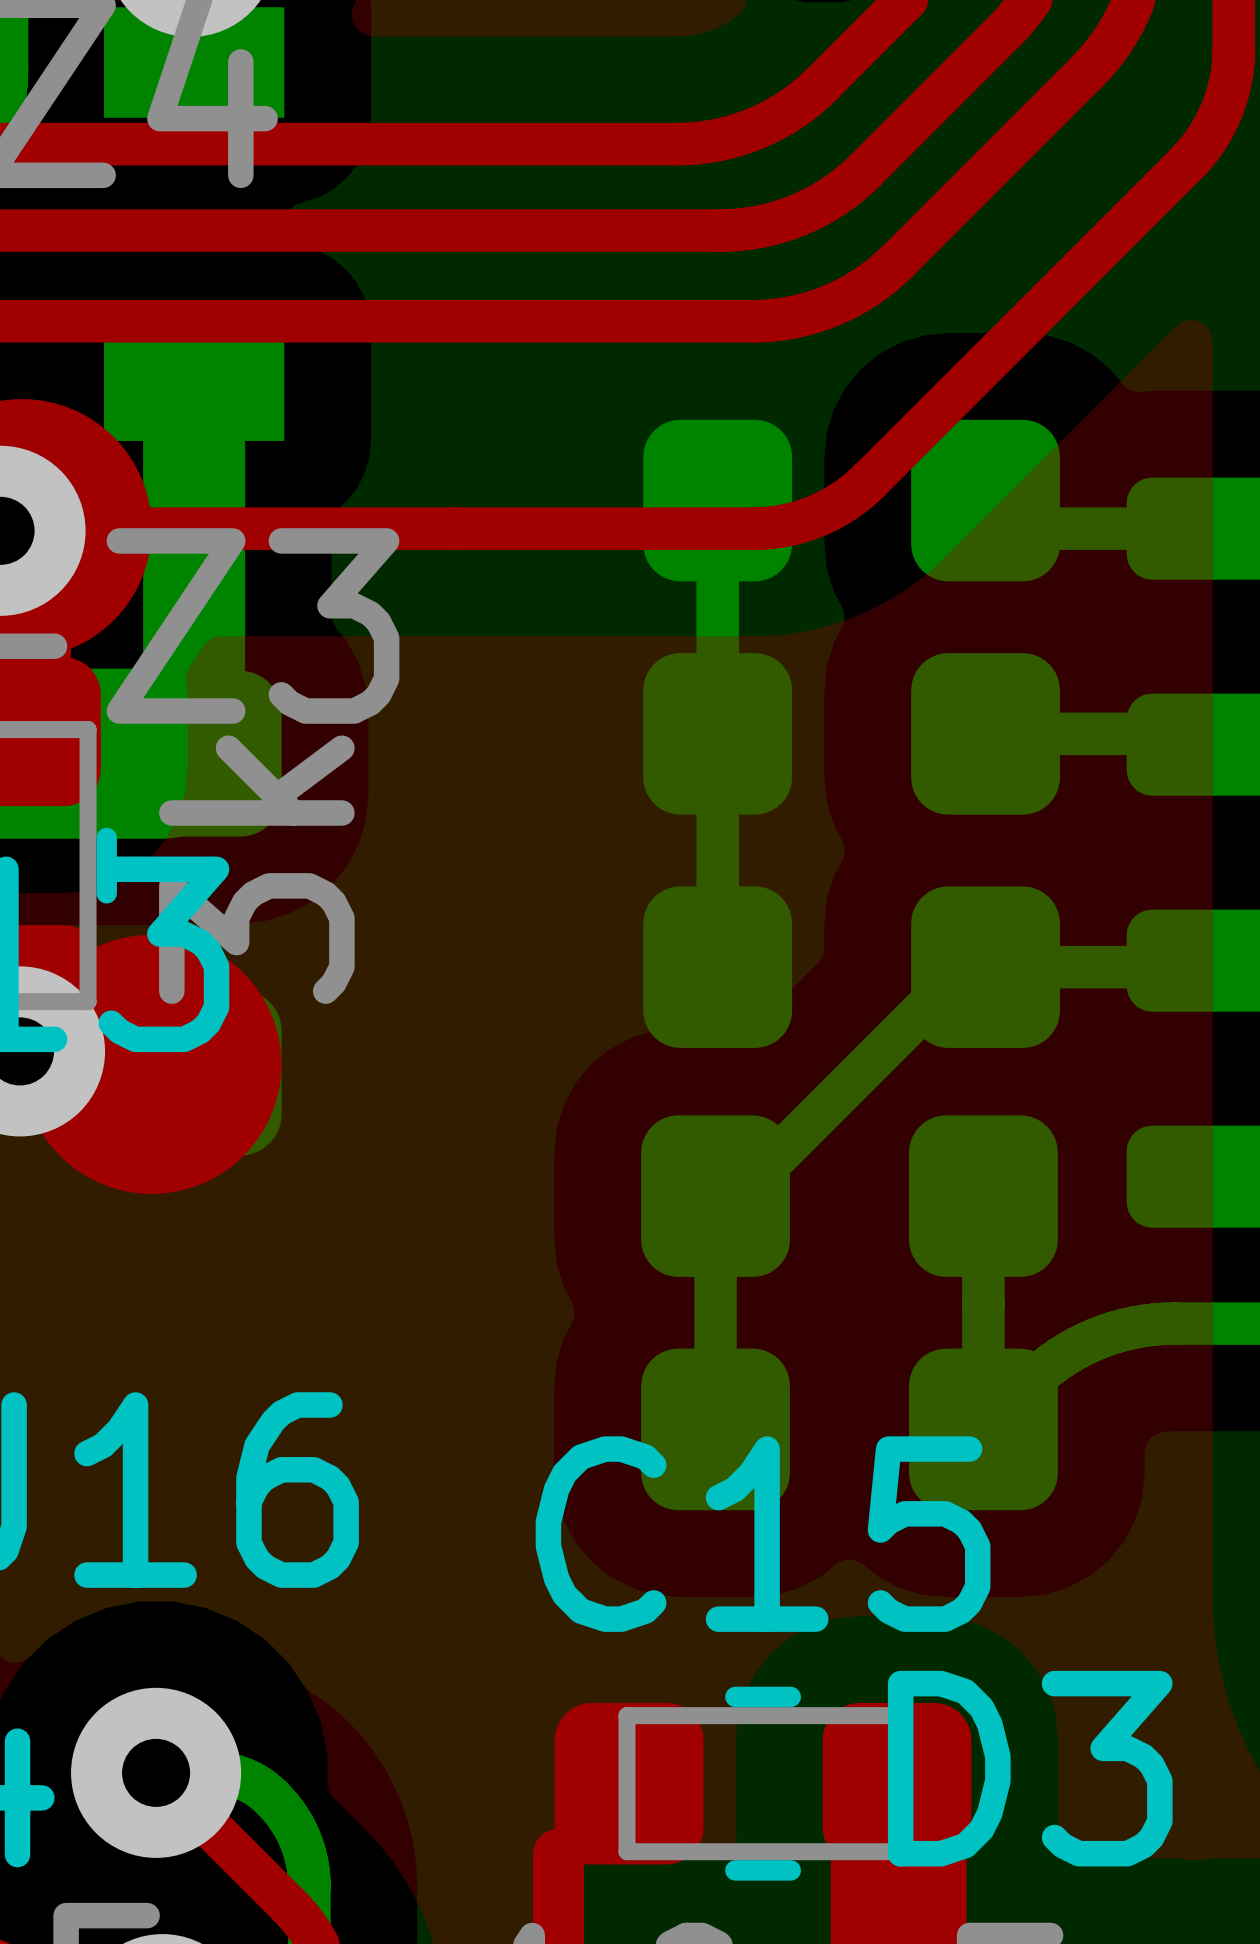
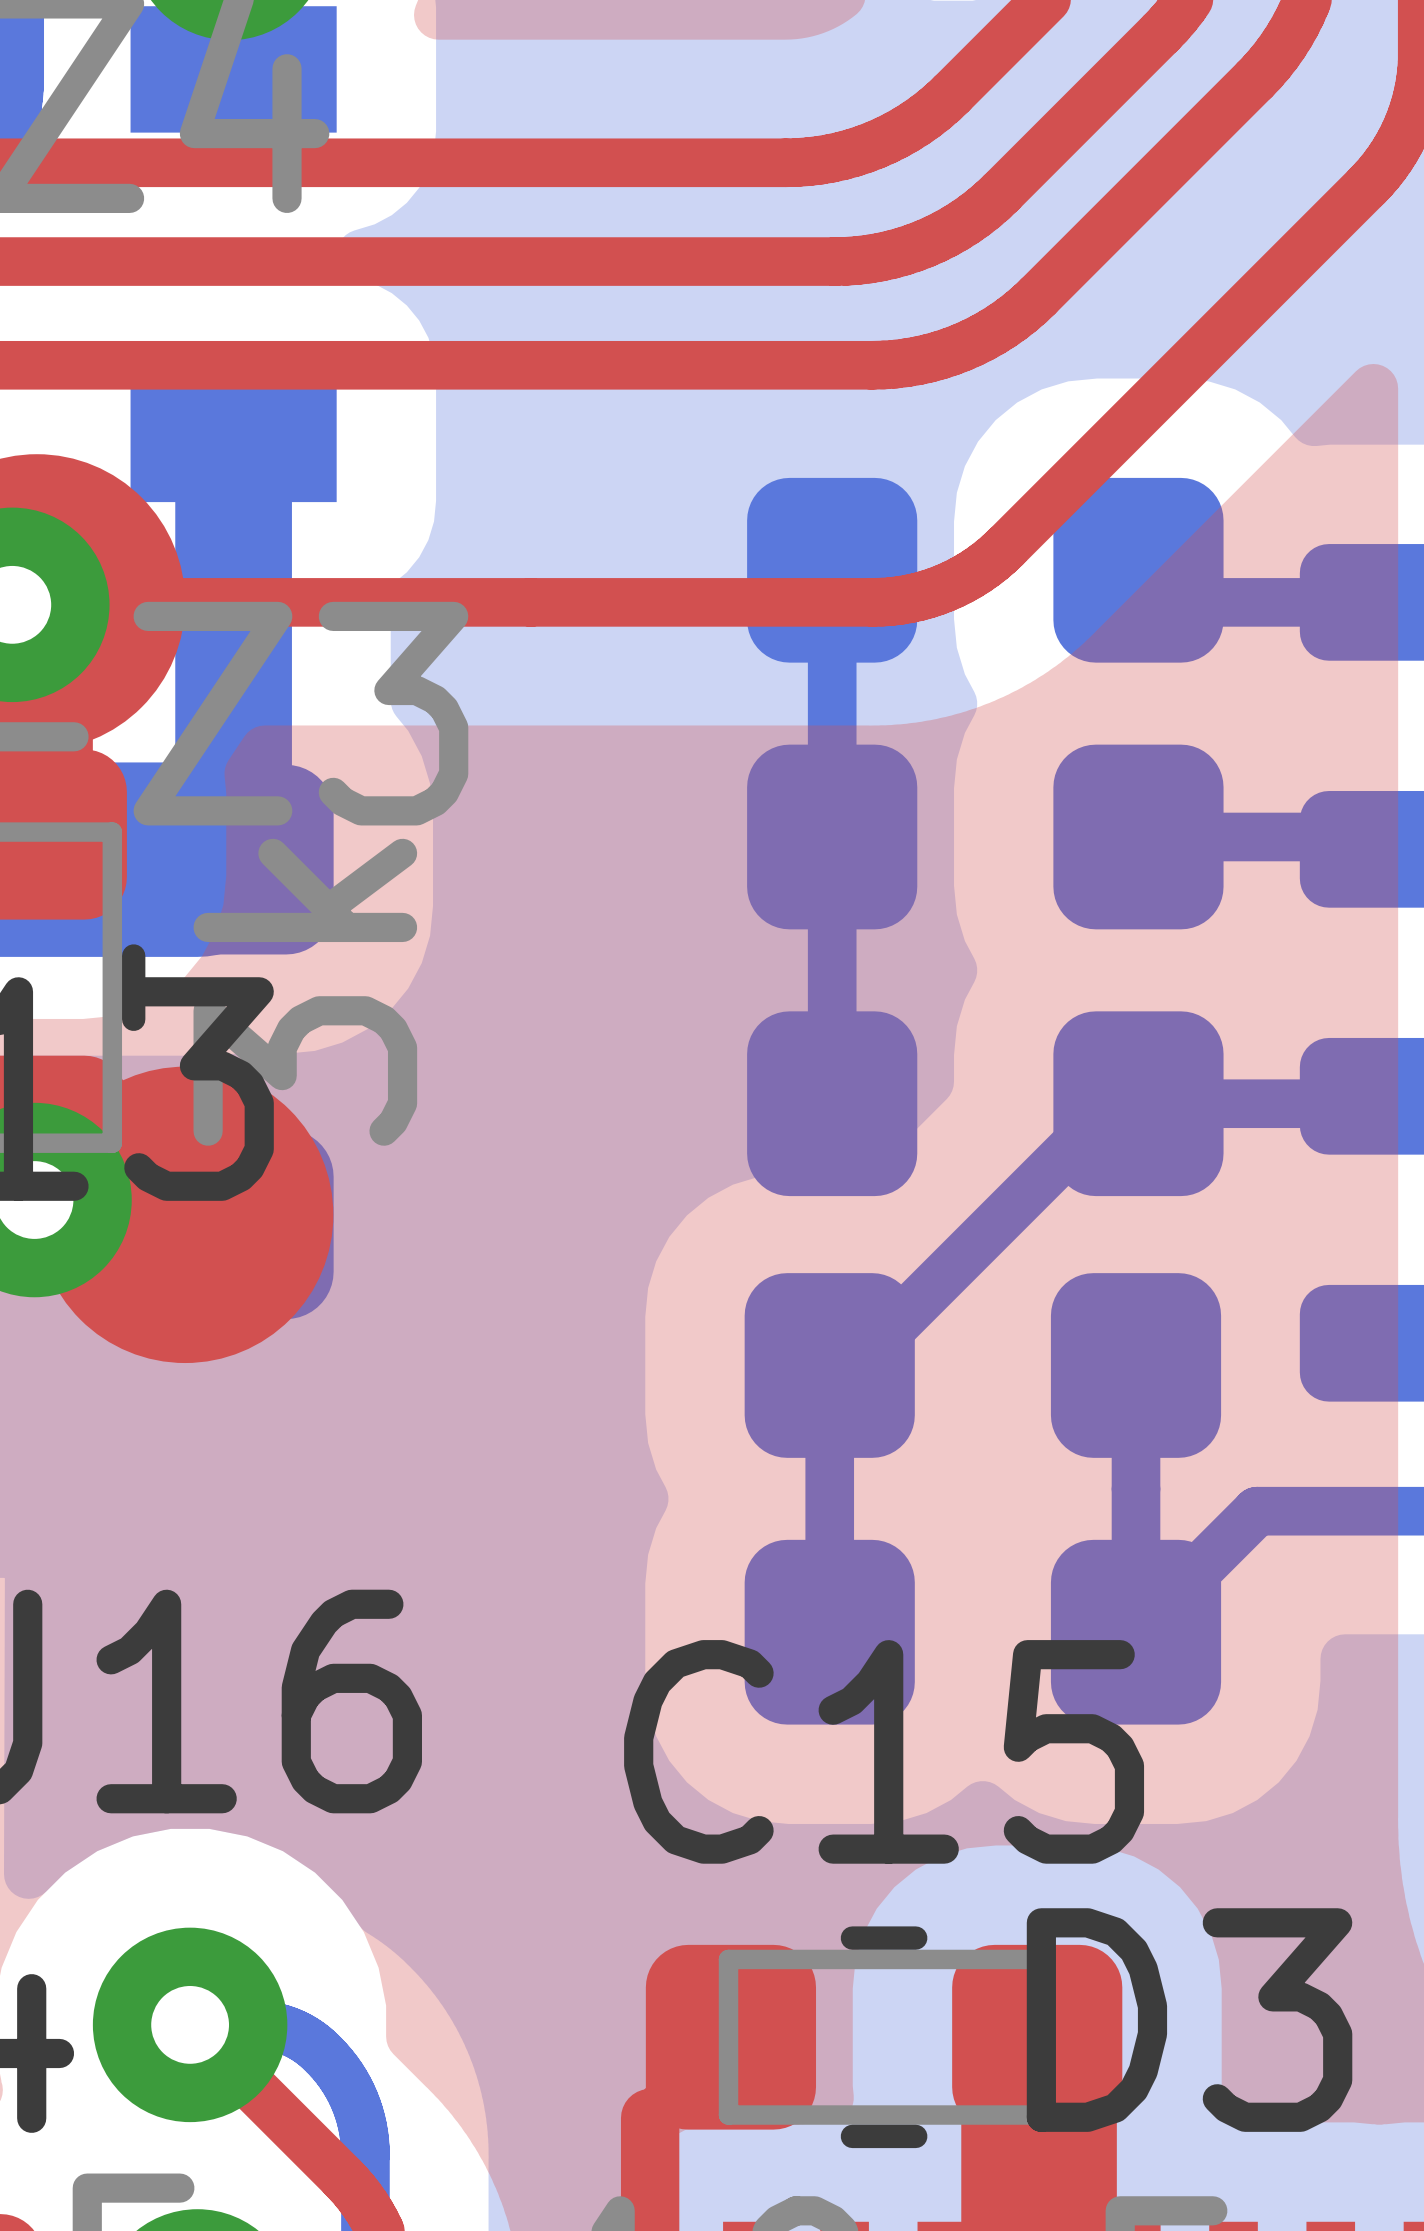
bottom track: (1174, 1323) (1134, 1327) (1095, 1339) (1060, 1358) (1029, 1383) -> (1354, 1511) (1257, 1511) (1188, 1579)

